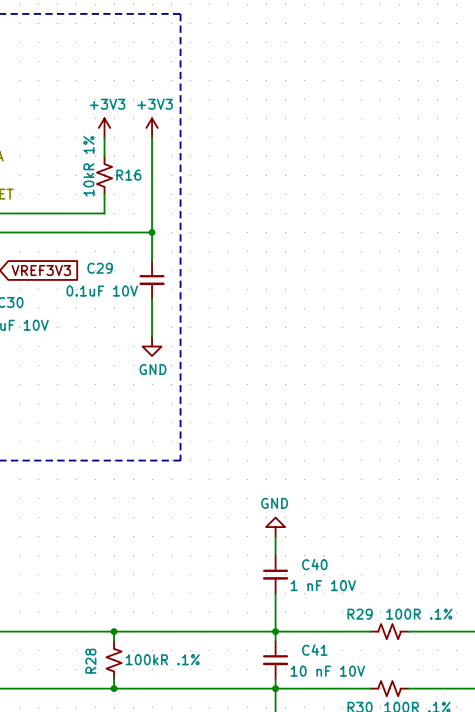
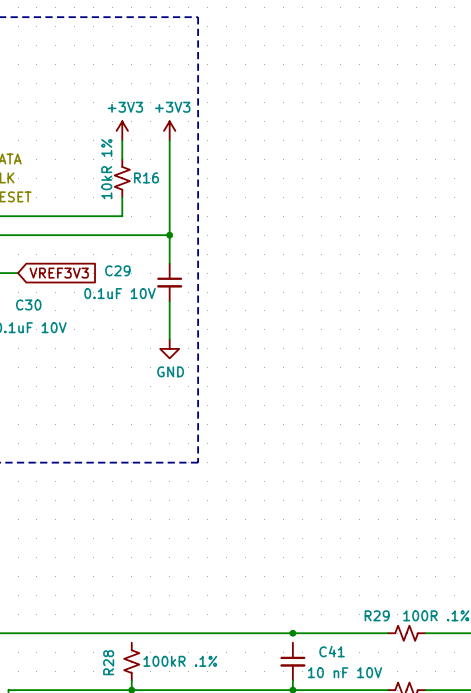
power symbol: GND (275, 527) -> none
wire: (275, 536) (275, 555) -> none
C40: 1 nF 10V (275, 574) -> none
wire: (275, 593) (275, 641) -> none
wire: (114, 631) (114, 641) -> none
junction: (114, 631) -> none

